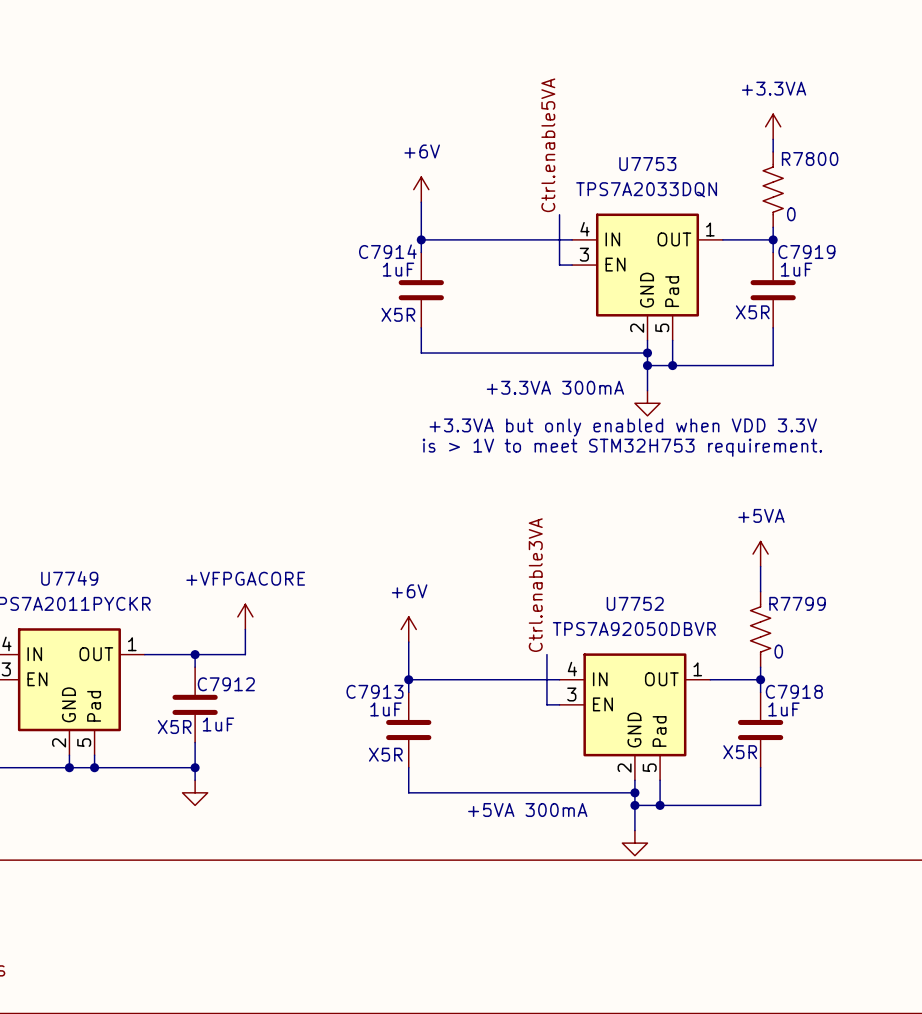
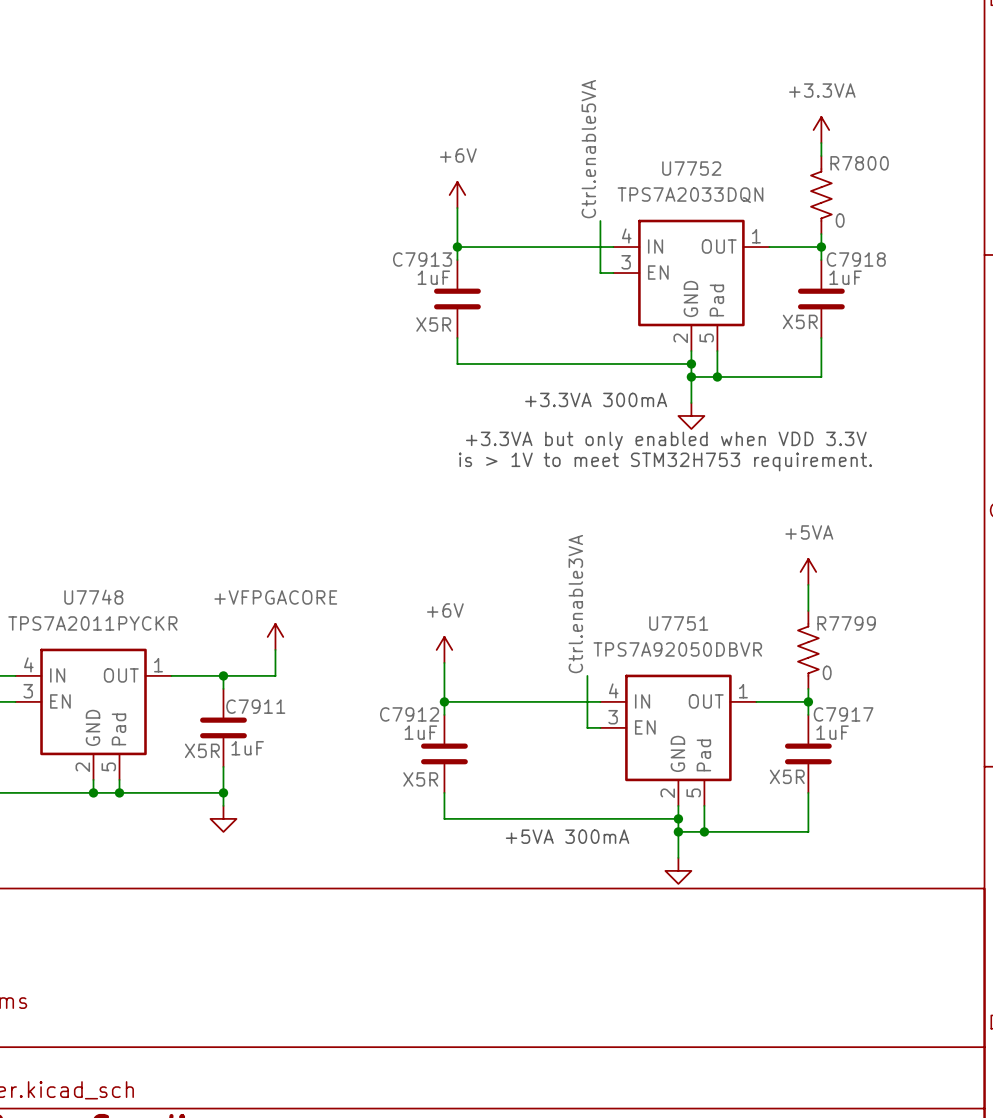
U7753 name: U7753 (647, 164) -> U7752 (691, 168)
C7914 name: C7914 (387, 251) -> C7913 (422, 259)
C7919 name: C7919 (806, 252) -> C7918 (856, 259)
U7749 name: U7749 (69, 578) -> U7748 (93, 597)
U7752 name: U7752 (635, 603) -> U7751 (678, 623)
C7912 name: C7912 (226, 684) -> C7911 (255, 706)
C7913 name: C7913 (375, 691) -> C7912 (409, 714)
C7918 name: C7918 (794, 691) -> C7917 (843, 714)

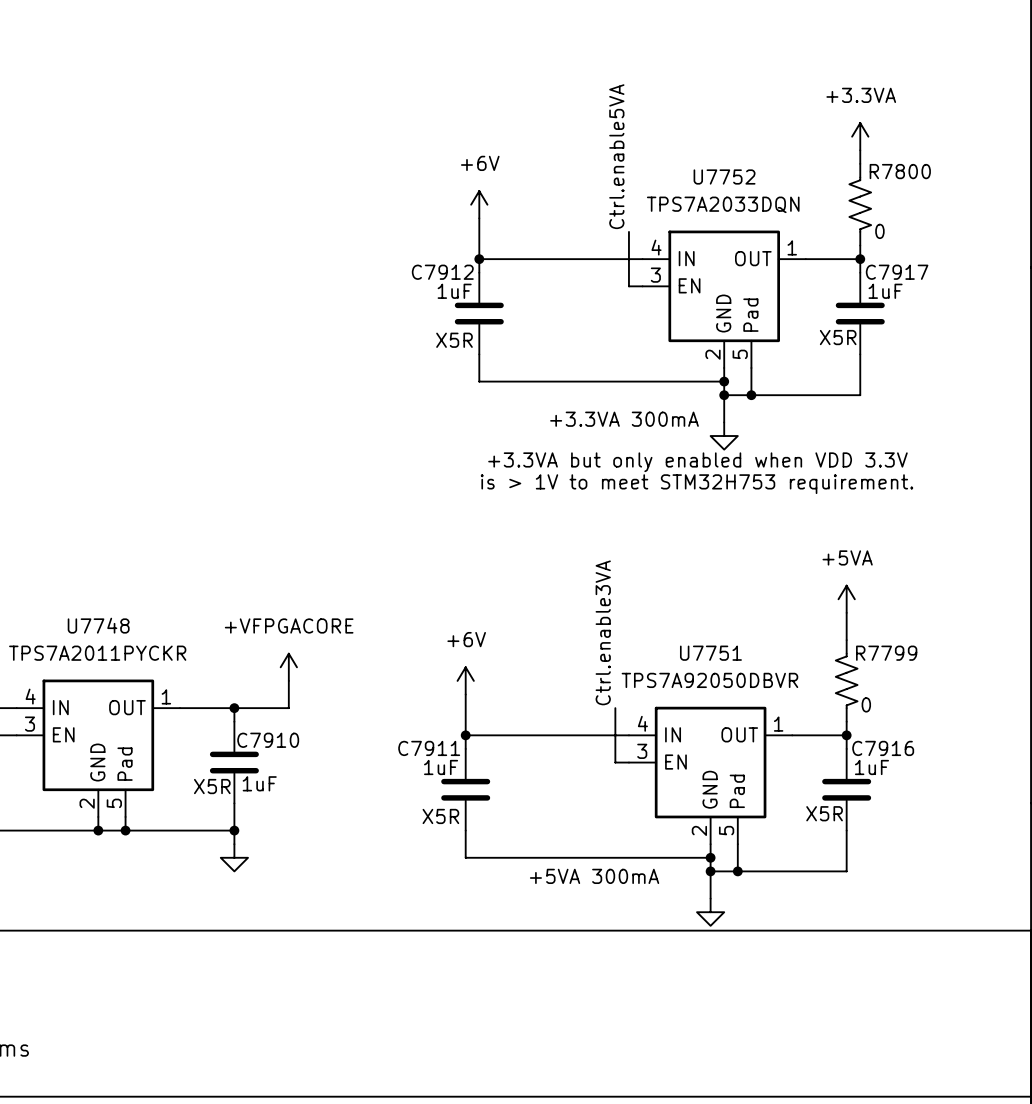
C7913 name: C7913 (422, 259) -> C7912 (442, 272)
C7918 name: C7918 (856, 259) -> C7917 (897, 272)
C7911 name: C7911 (255, 706) -> C7910 (268, 740)
C7912 name: C7912 (409, 714) -> C7911 (429, 748)
C7917 name: C7917 (843, 714) -> C7916 (883, 748)

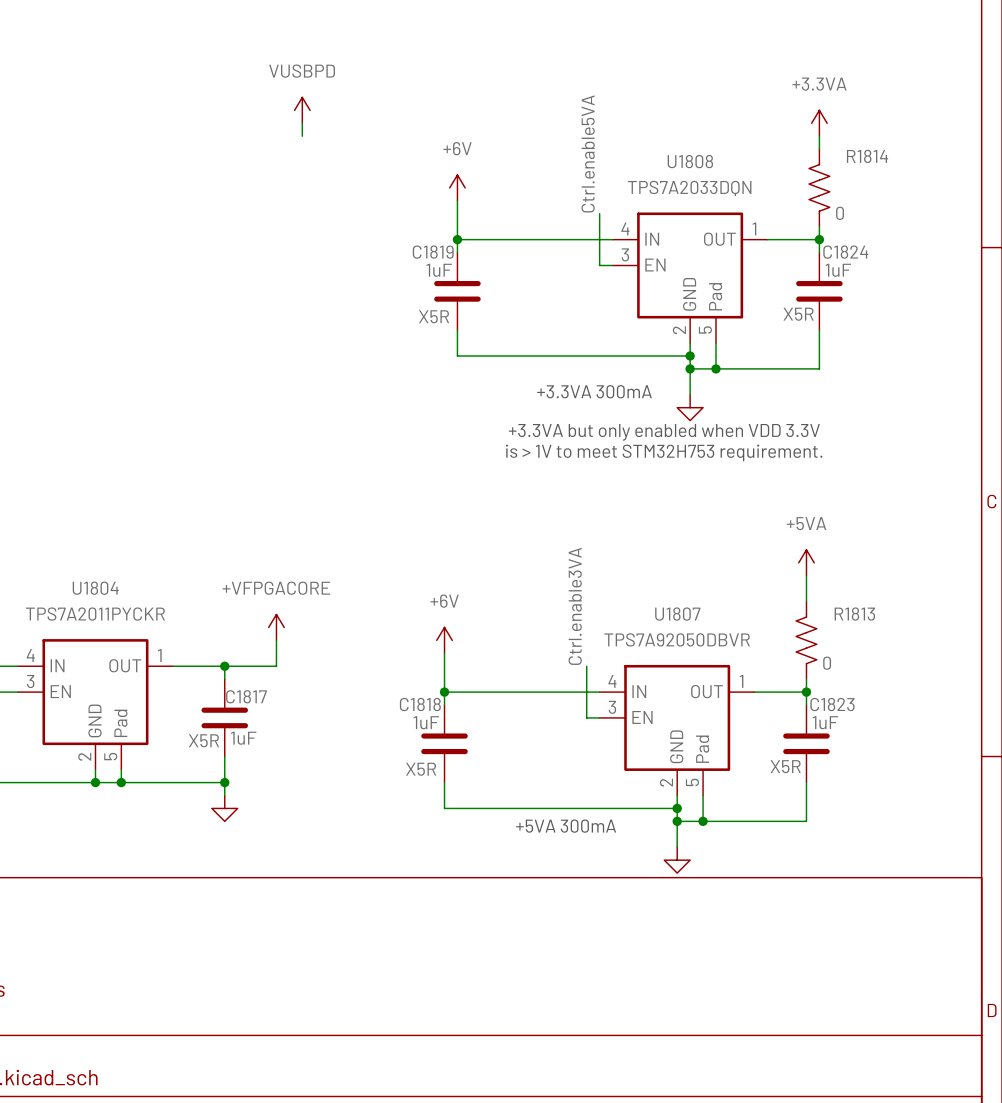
power symbol: none -> VUSBPD (302, 110)
wire: none -> (302, 123) (302, 136)
R7800 name: R7800 (900, 171) -> R1814 (867, 156)
U7752 name: U7752 (724, 176) -> U1808 (690, 161)
C7912 name: C7912 (442, 272) -> C1819 (433, 252)
C7917 name: C7917 (897, 272) -> C1824 (845, 252)
U7748 name: U7748 (98, 625) -> U1804 (95, 588)
U7751 name: U7751 (710, 653) -> U1807 (677, 614)
R7799 name: R7799 (886, 653) -> R1813 (854, 614)
C7910 name: C7910 (268, 740) -> C1817 (246, 696)
C7911 name: C7911 (429, 748) -> C1818 (420, 704)
C7916 name: C7916 (883, 748) -> C1823 (832, 704)

